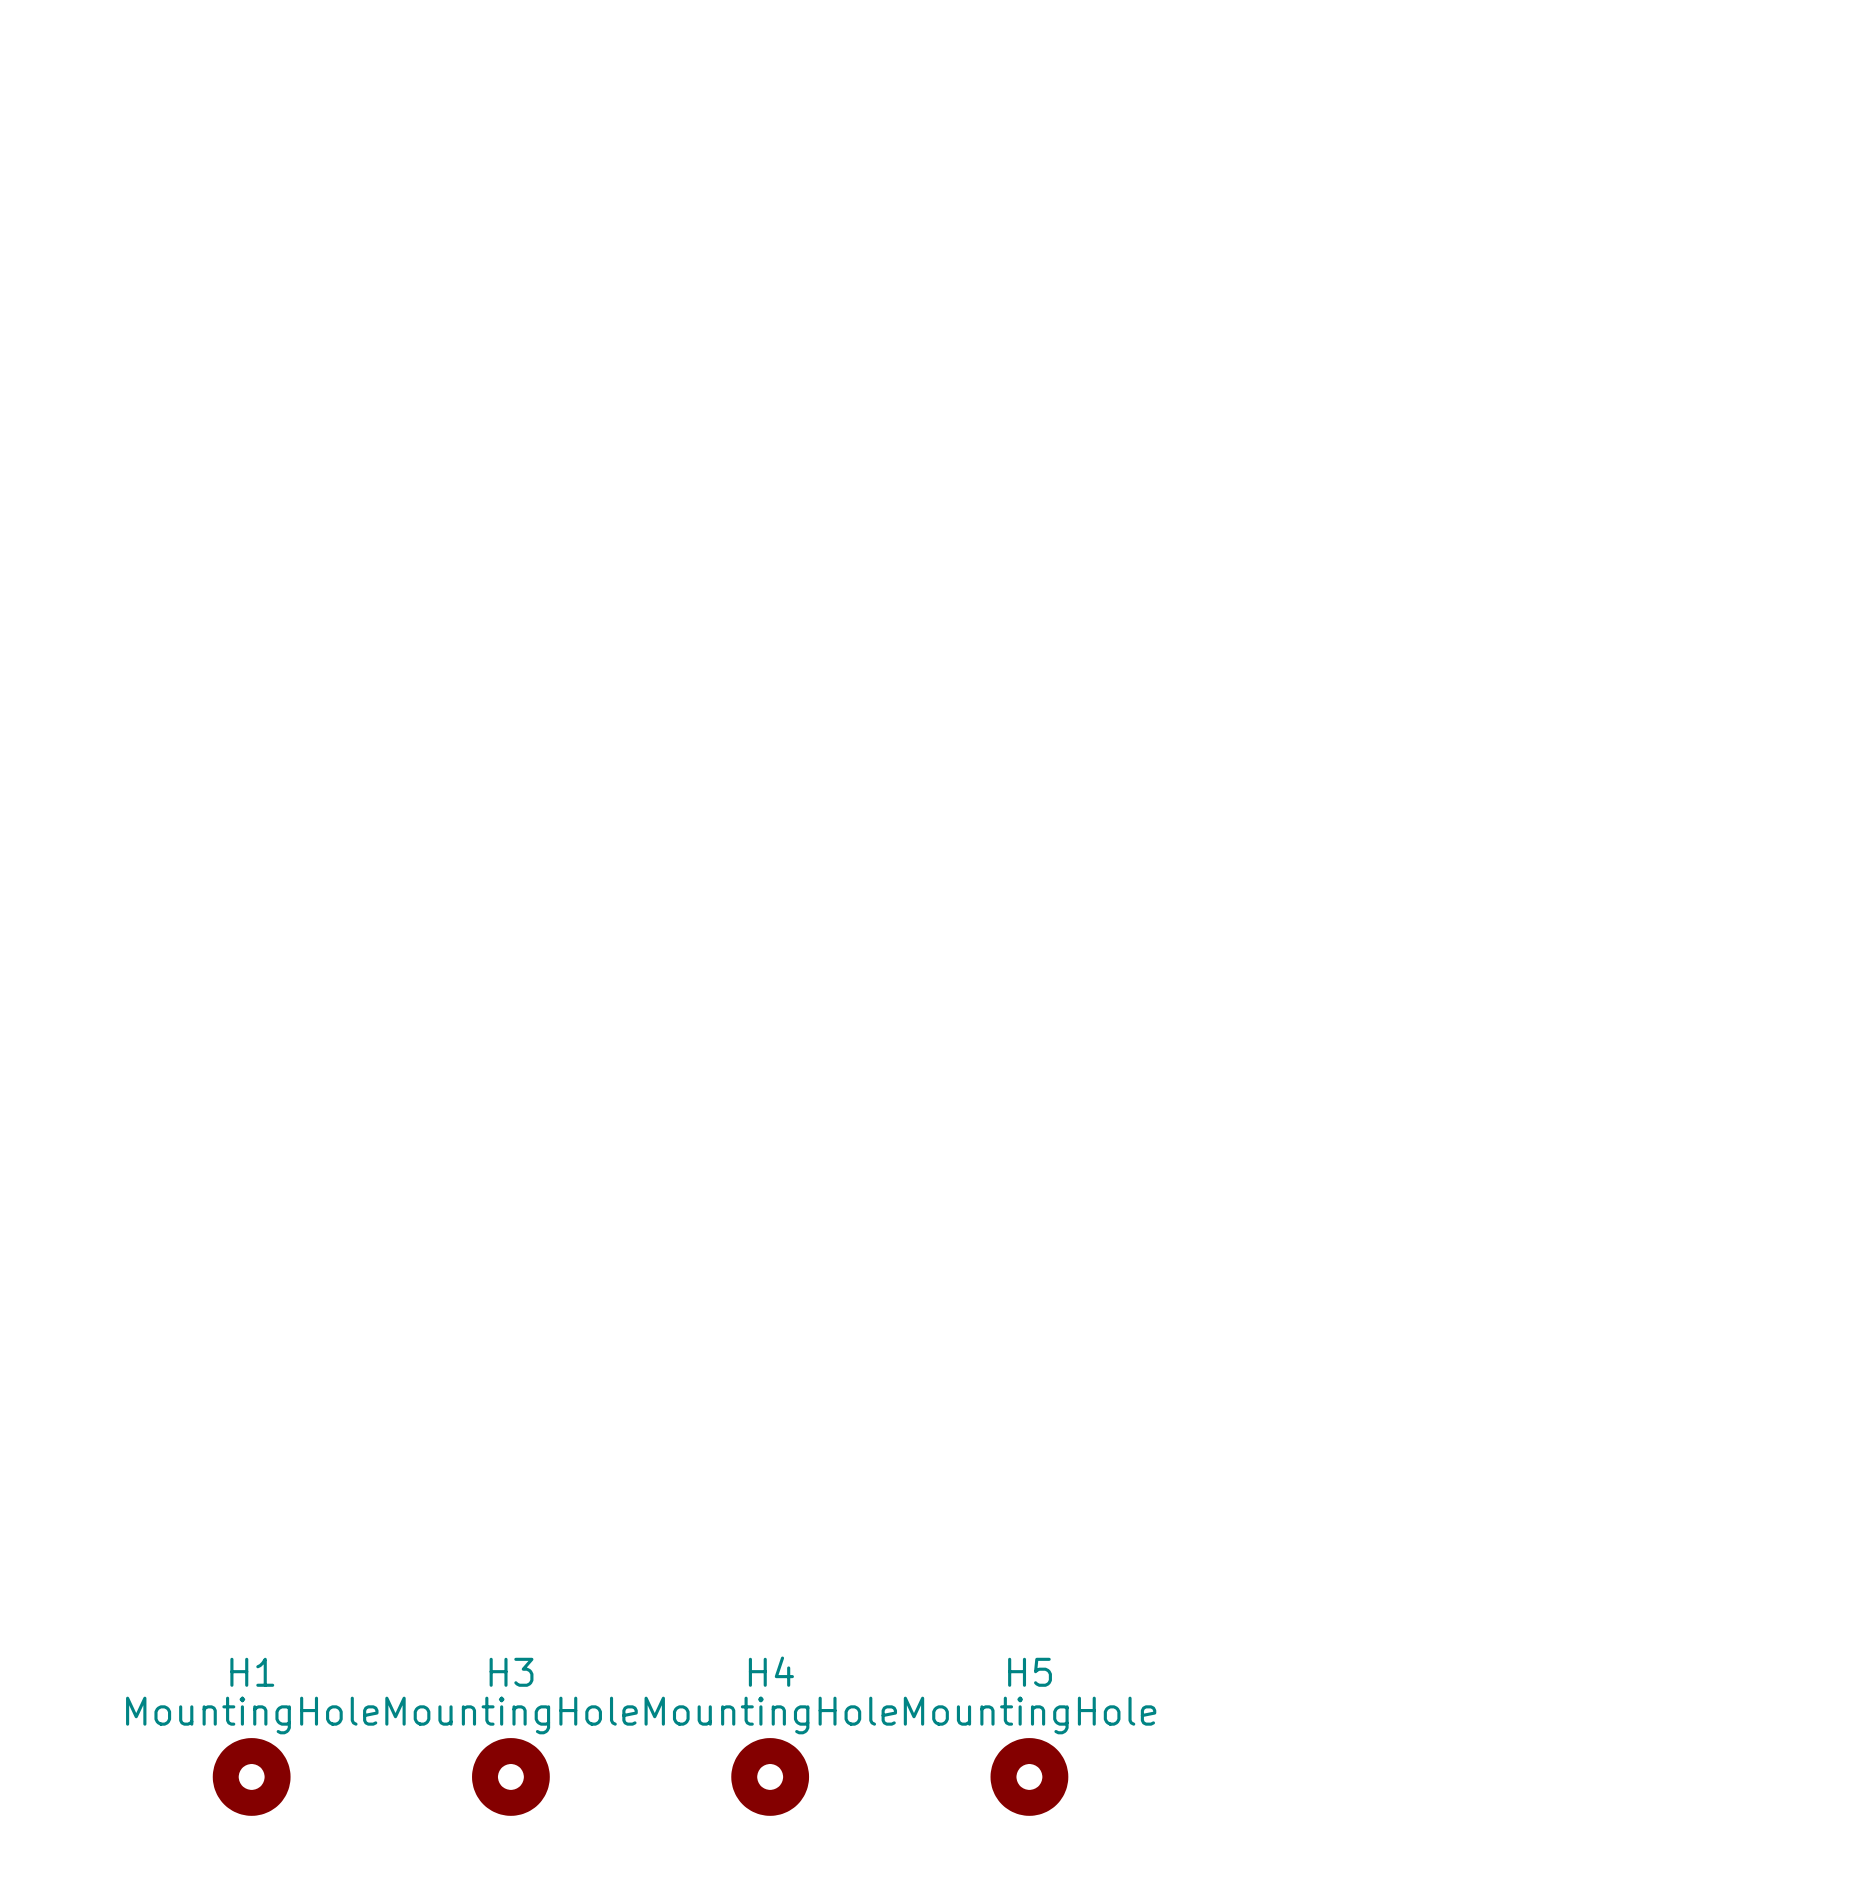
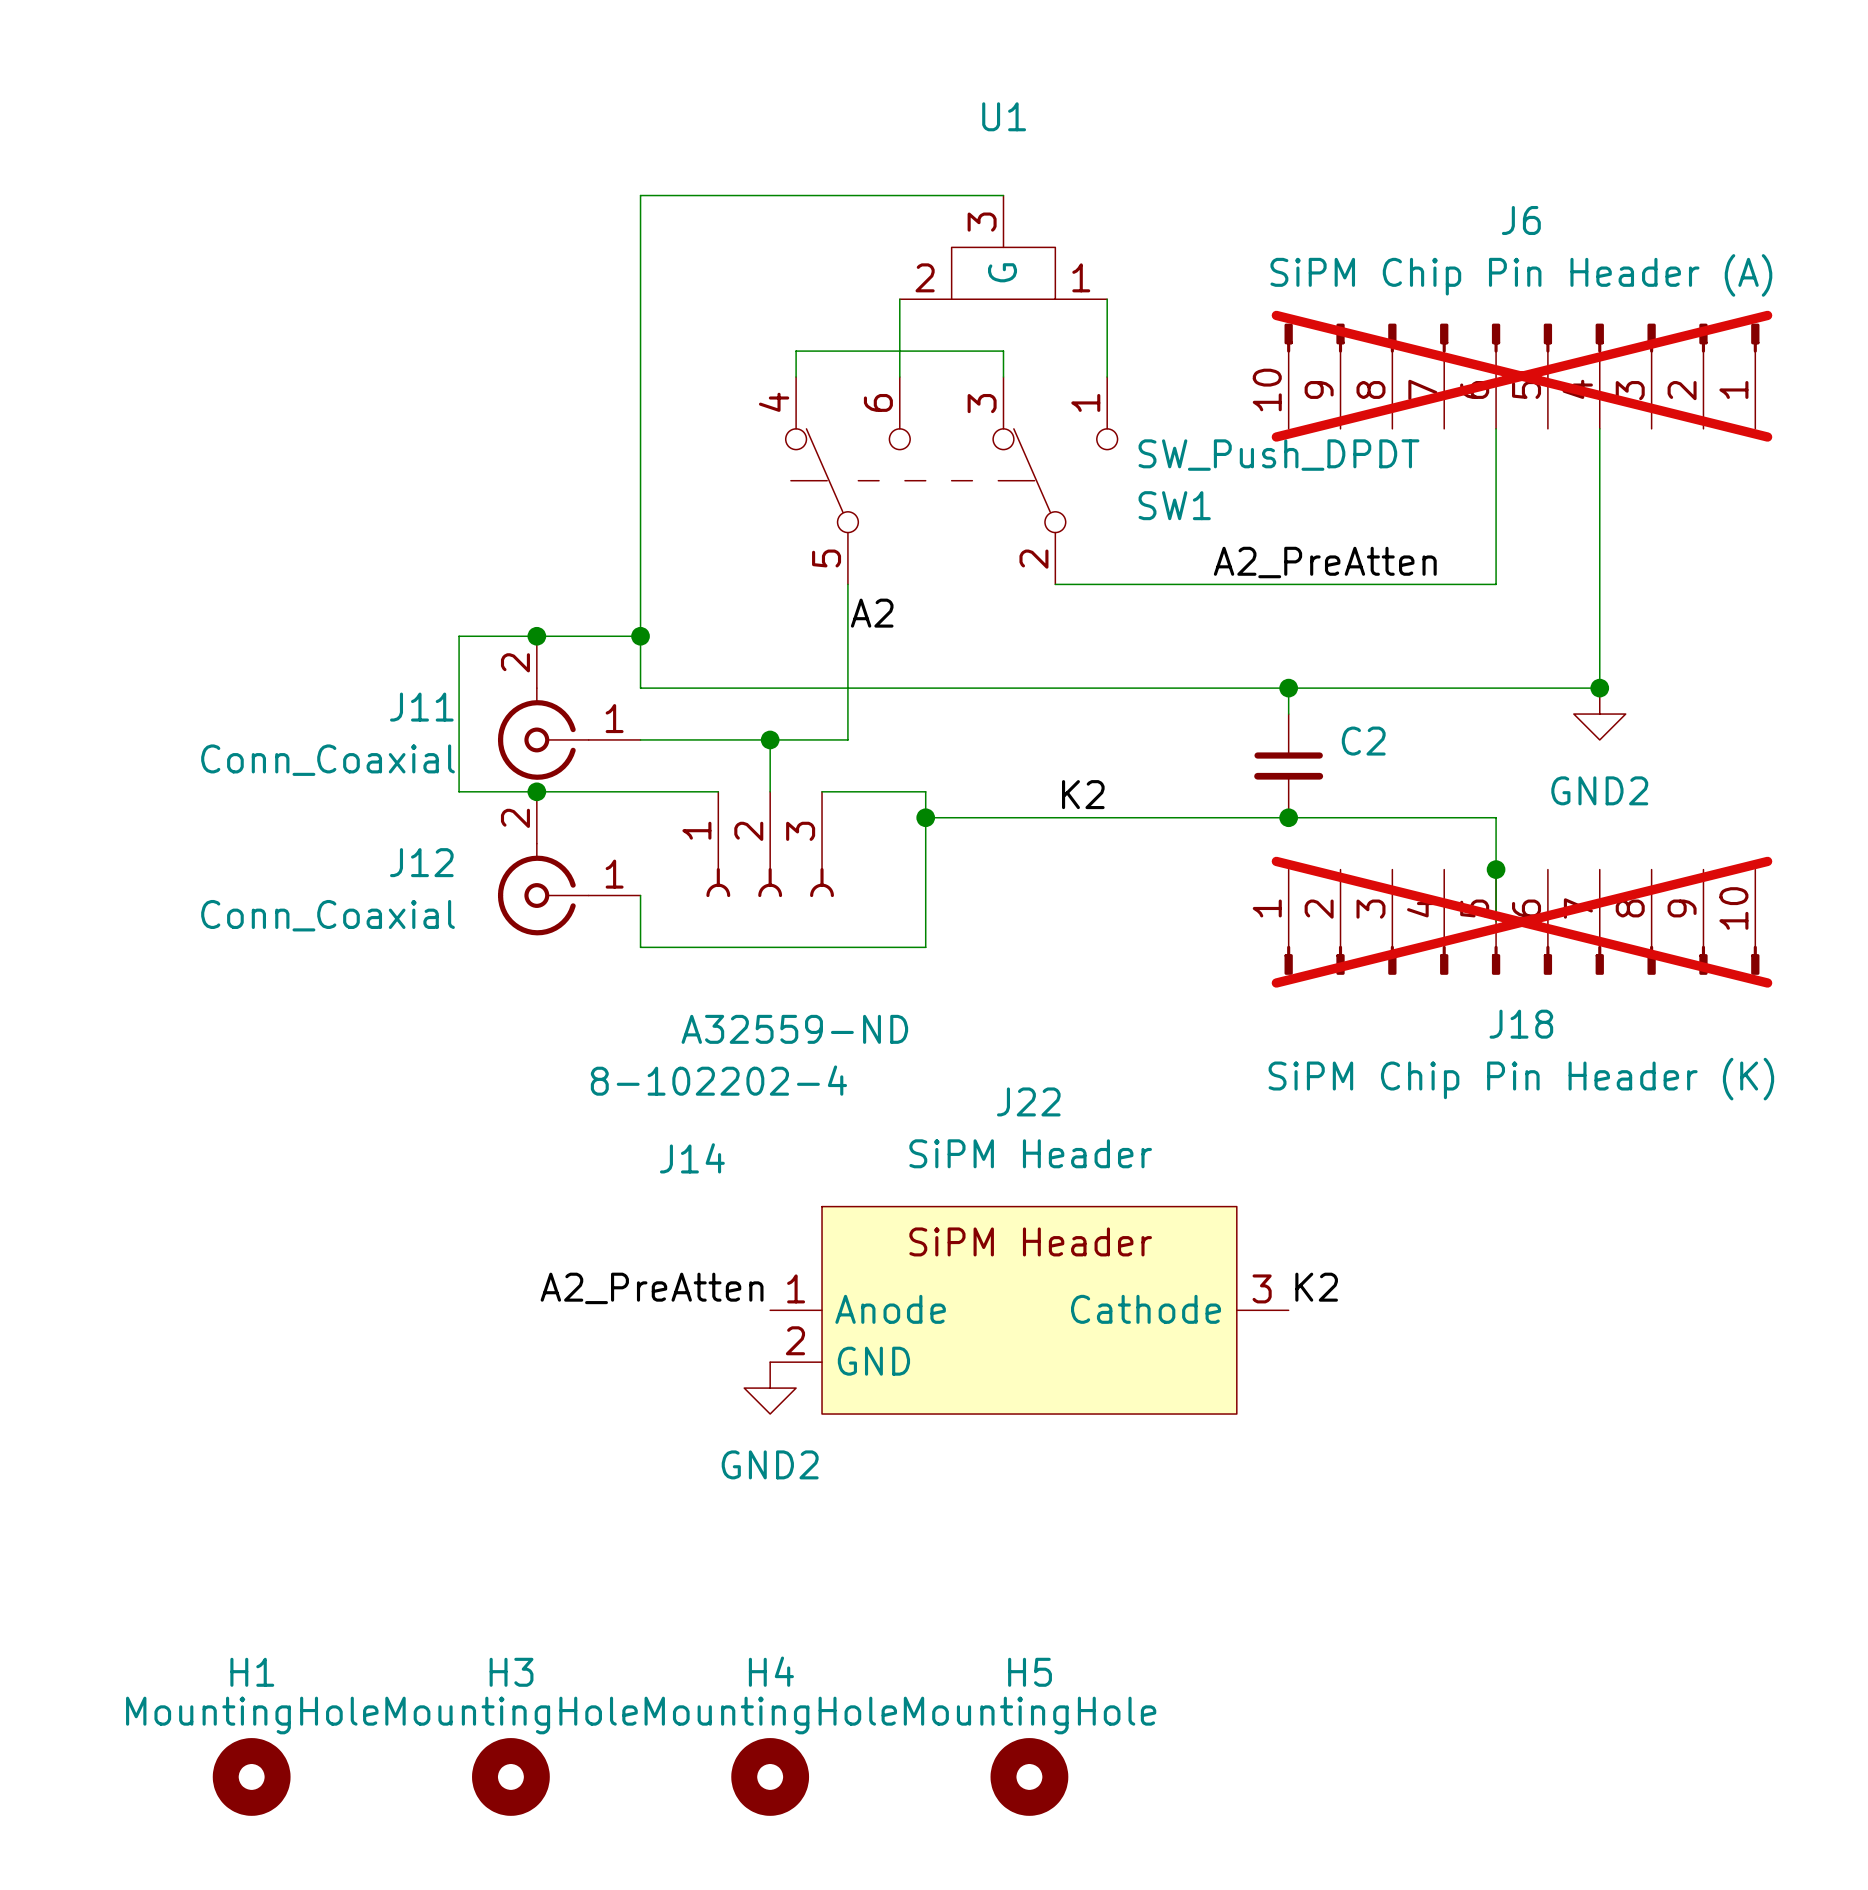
wire: none -> (1003, 195) (640, 195) (640, 688) (1599, 688) (1599, 428)
U1: none -> (1003, 247)
wire: none -> (899, 299) (899, 377)
wire: none -> (1107, 299) (1107, 377)
J6: none -> SiPM Chip Pin Header (A) (1521, 376)
wire: none -> (796, 377) (796, 351) (1003, 351) (1003, 377)
wire: none -> (1496, 428) (1496, 584) (1055, 584)
SW1: none -> SW_Push_DPDT (951, 480)
label: none -> A2_PreAtten (1325, 562)
wire: none -> (847, 584) (847, 739) (640, 739)
label: none -> A2 (872, 613)
junction: none -> (536, 636)
wire: none -> (640, 636) (459, 636) (459, 791) (718, 791)
junction: none -> (640, 636)
wire: none -> (1288, 688) (1288, 714)
junction: none -> (1288, 688)
junction: none -> (1599, 688)
J11: none -> Conn_Coaxial (569, 708)
power symbol: none -> GND2 (1599, 714)
wire: none -> (770, 739) (770, 791)
junction: none -> (770, 739)
C2: none -> (1288, 765)
junction: none -> (536, 791)
wire: none -> (822, 791) (925, 791) (925, 947) (640, 947) (640, 895)
label: none -> K2 (1083, 794)
wire: none -> (925, 817) (1496, 817) (1496, 921)
junction: none -> (925, 817)
junction: none -> (1288, 817)
J14: none -> 8-102202-4 (770, 844)
J12: none -> Conn_Coaxial (569, 863)
junction: none -> (1496, 869)
J18: none -> SiPM Chip Pin Header (K) (1521, 922)
label: none -> K2 (1316, 1287)
label: none -> A2_PreAtten (652, 1288)
J22: none -> SiPM Header (1029, 1310)
power symbol: none -> GND2 (770, 1388)

